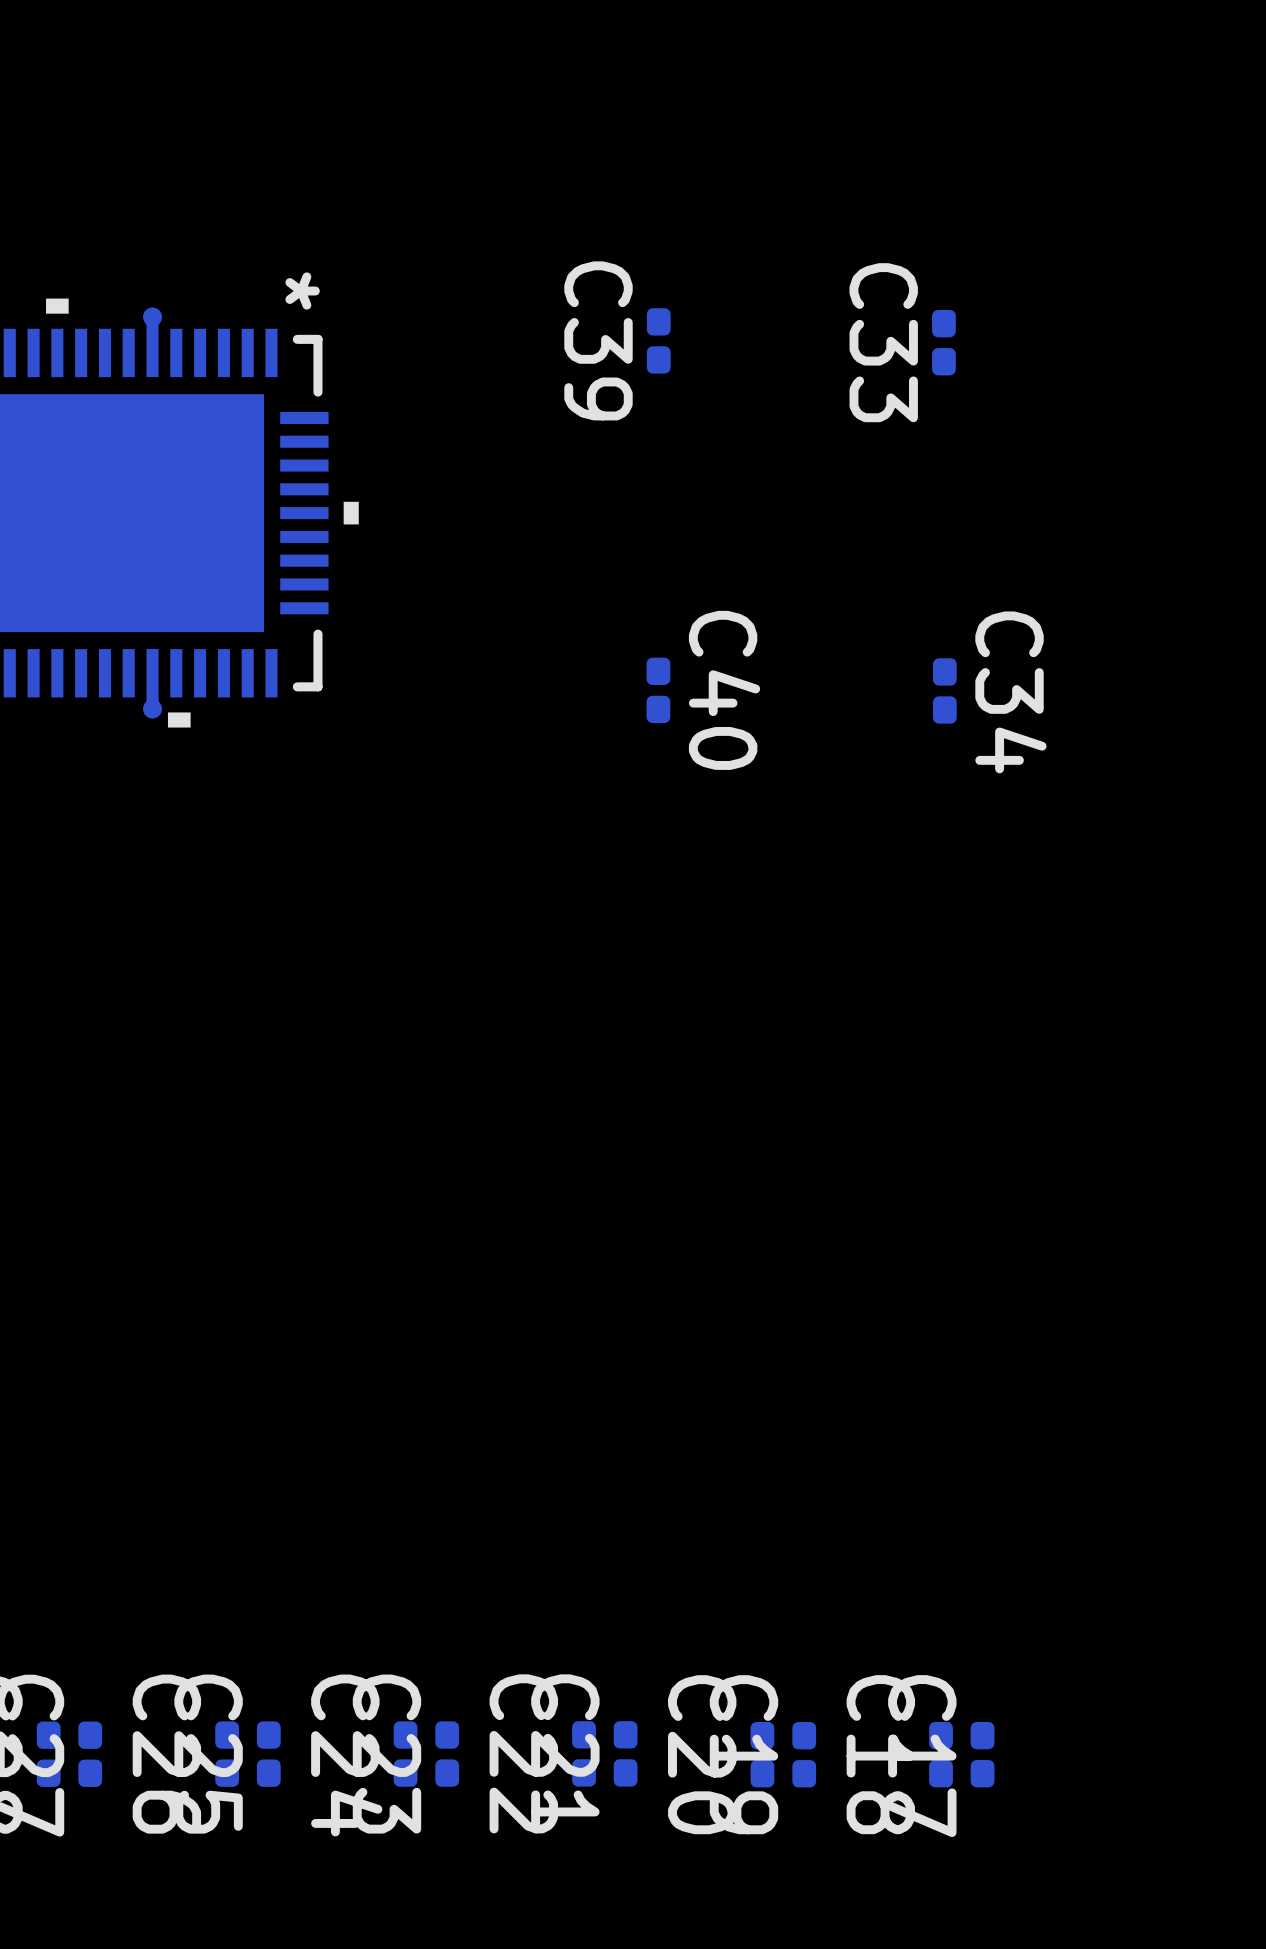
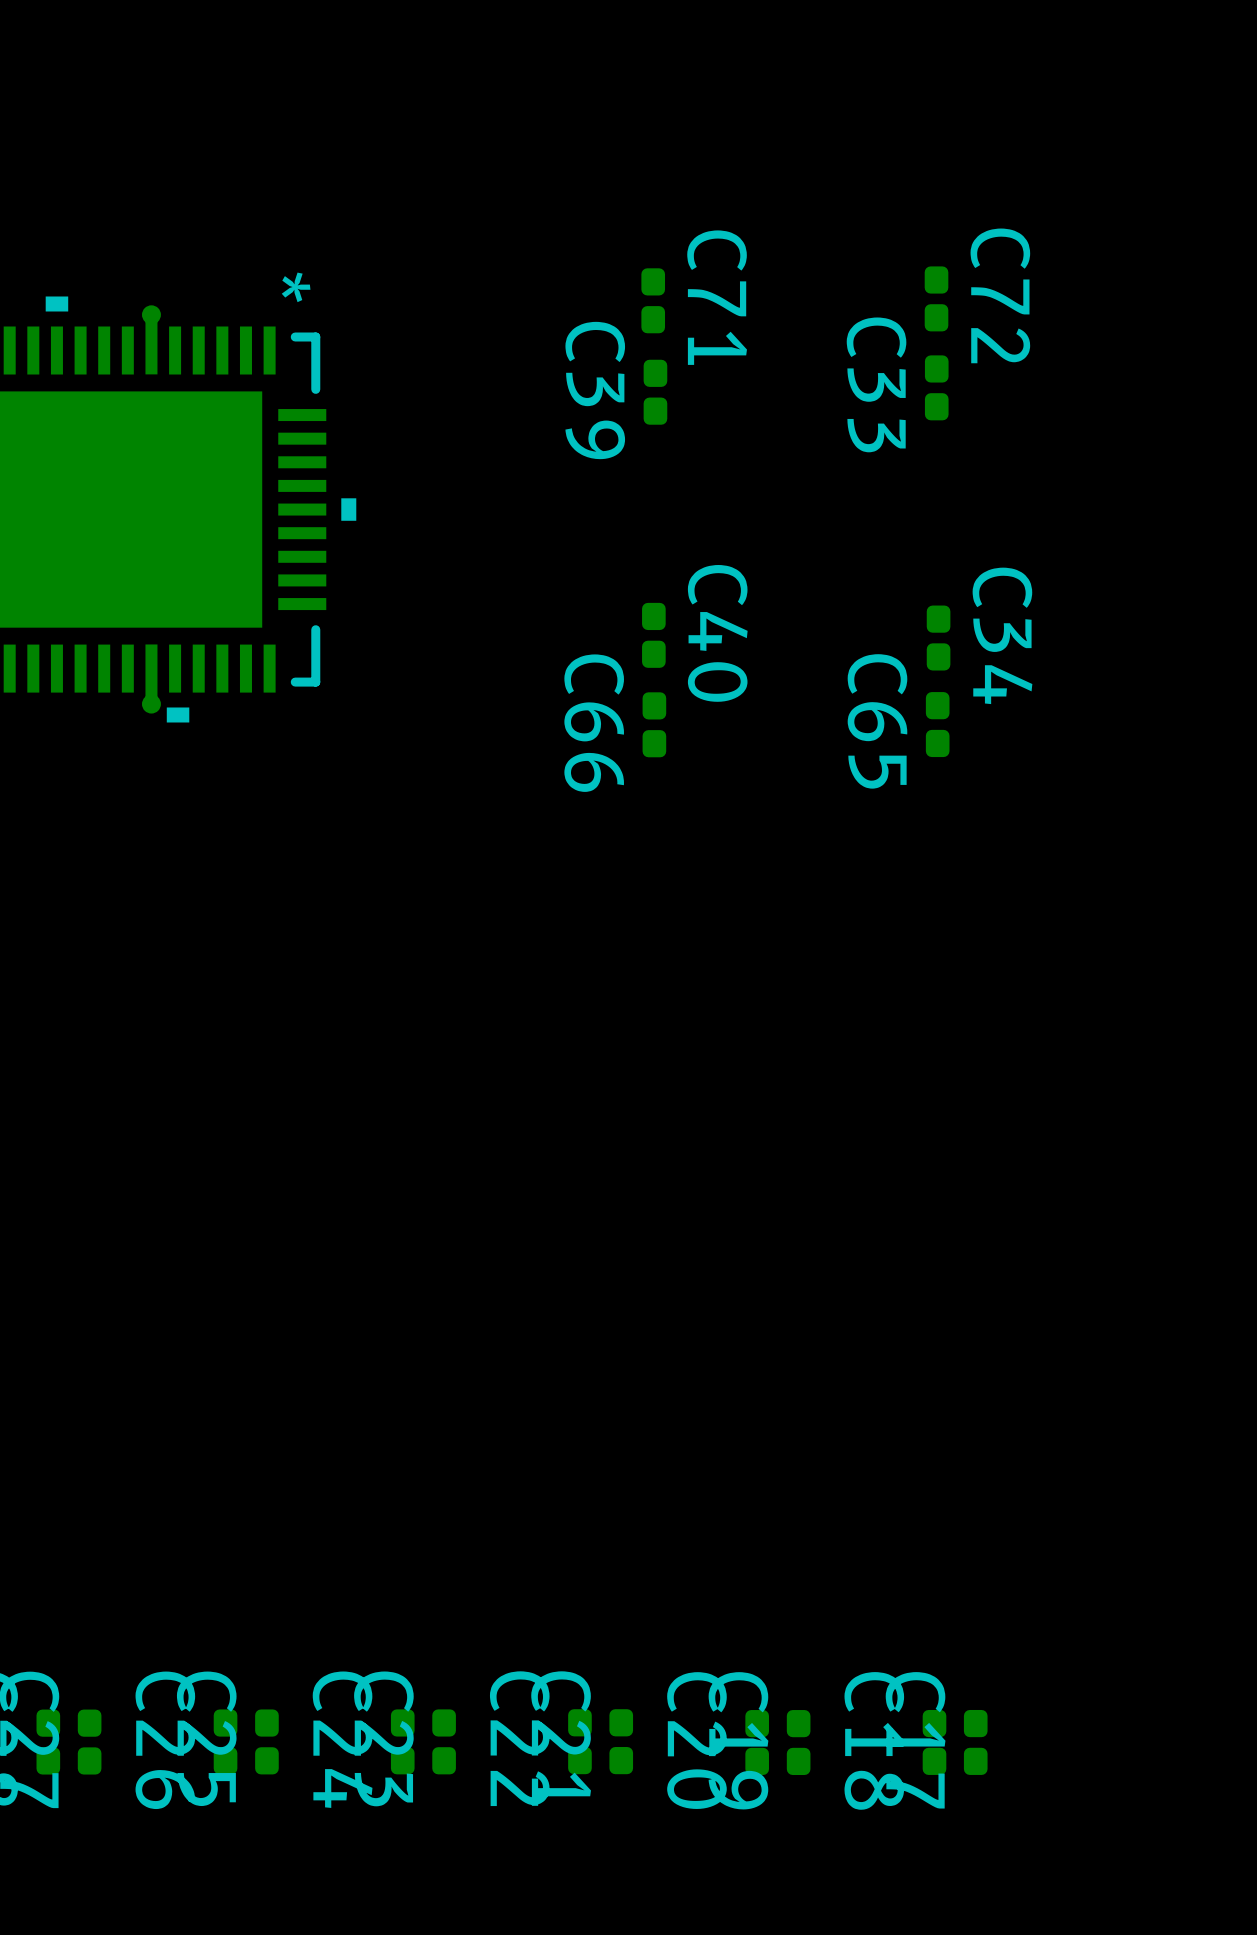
C72: none -> (936, 298)
C71: none -> (653, 300)
C39 position: (658, 340) -> (655, 392)
C33 position: (943, 342) -> (936, 387)
C40 position: (658, 690) -> (653, 635)
C34 position: (944, 690) -> (938, 638)
C66: none -> (654, 724)
C65: none -> (937, 724)

